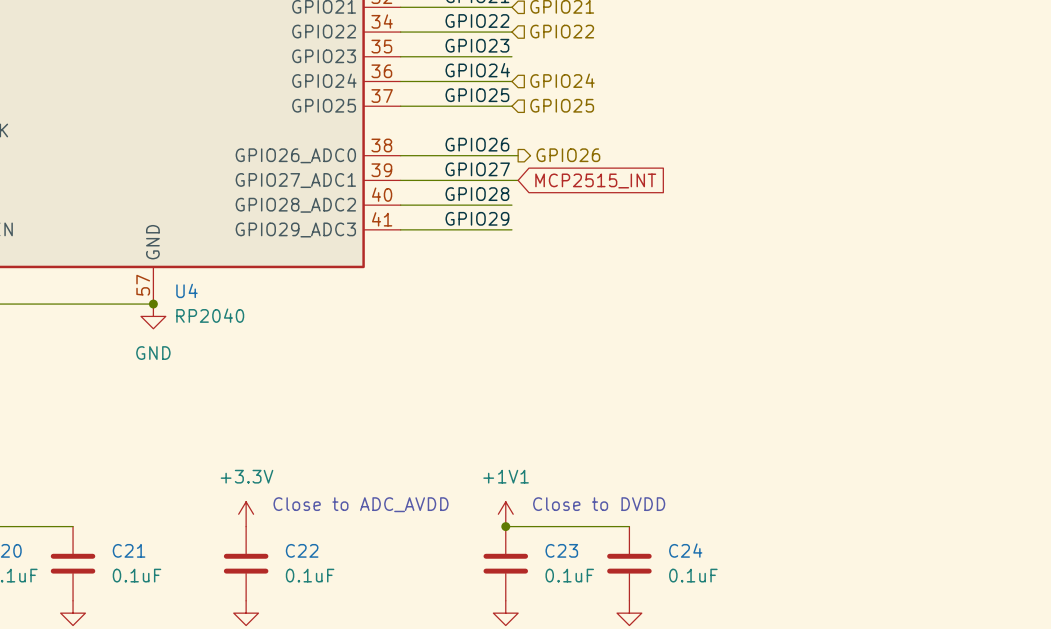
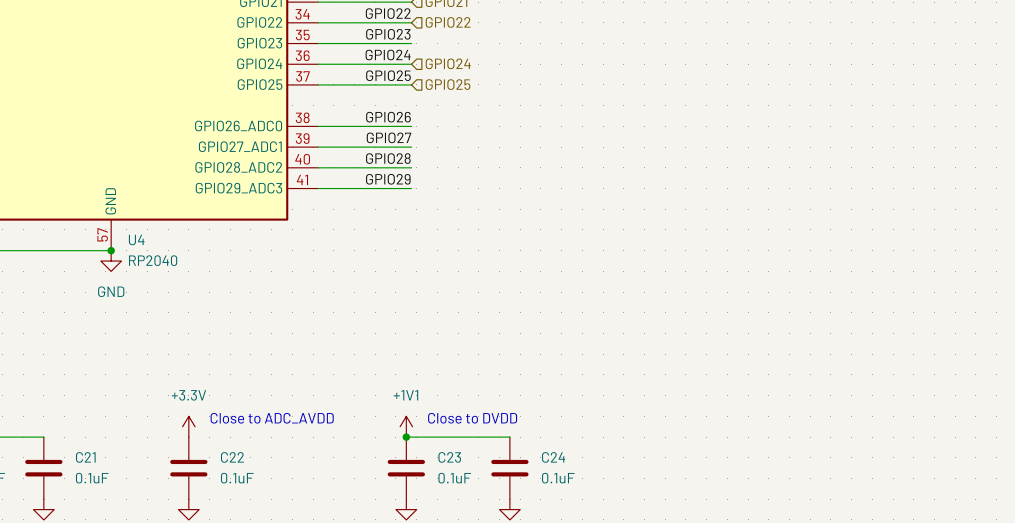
wire: (511, 155) (518, 155) -> none
hierarchical label: GPIO26 (568, 155) -> none
wire: (511, 180) (518, 180) -> none
global label: MCP2515_INT (595, 180) -> none

